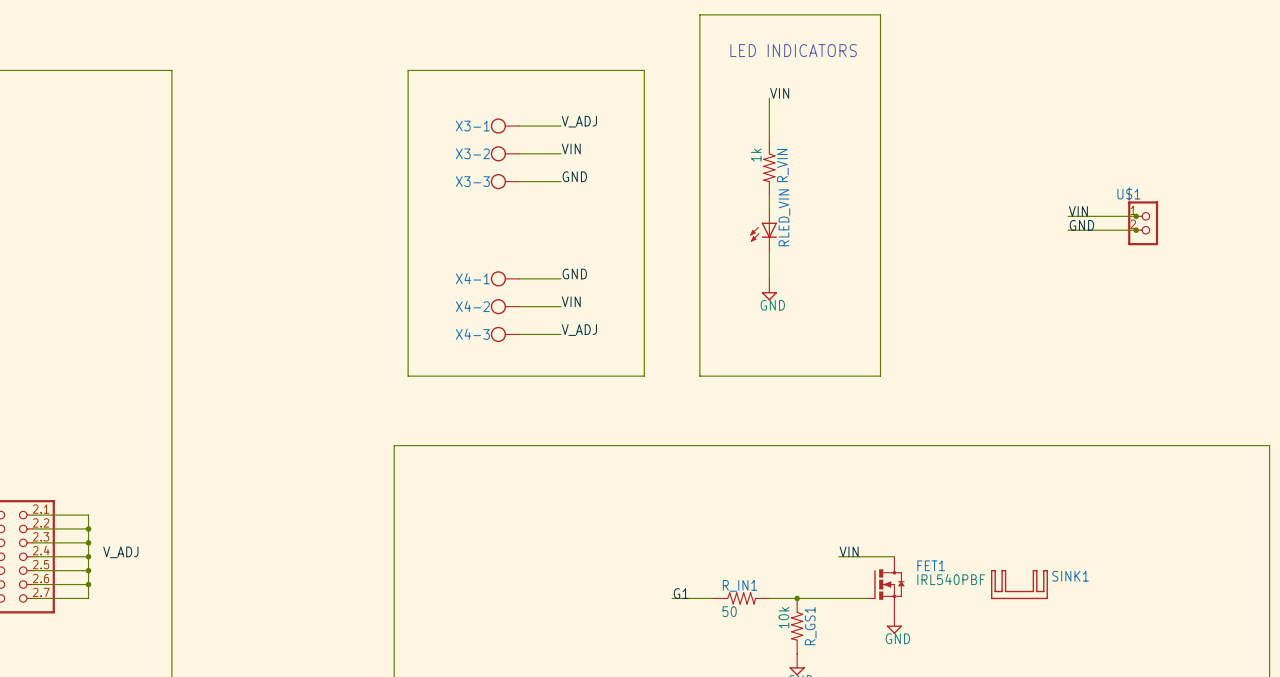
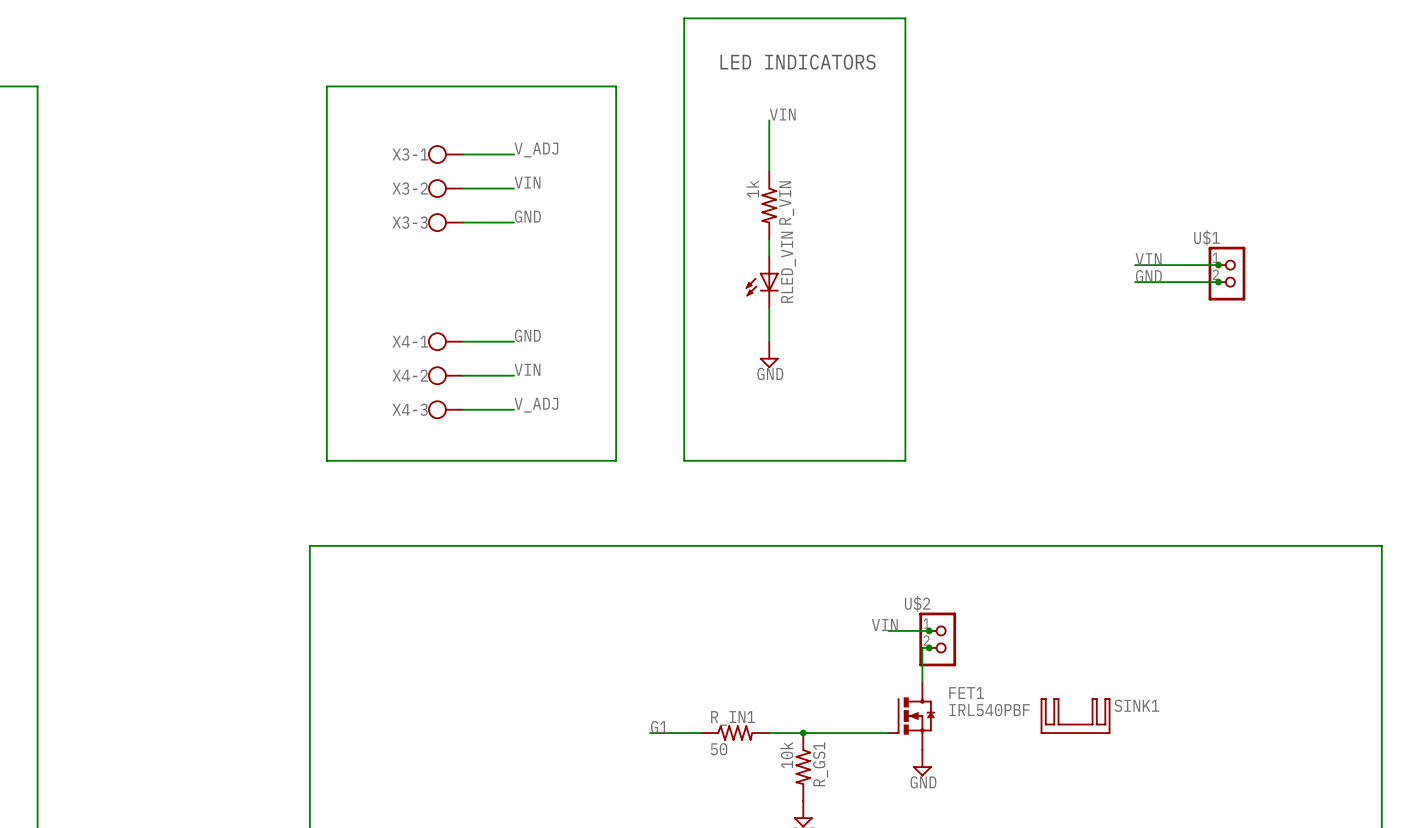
wire: none -> (888, 630) (930, 630)
junction: none -> (929, 630)
U$2: none -> (937, 639)
junction: none -> (929, 647)
label position: VIN (849, 551) -> VIN (884, 624)
wire: (838, 556) (894, 556) -> (930, 647) (922, 647) (922, 681)

